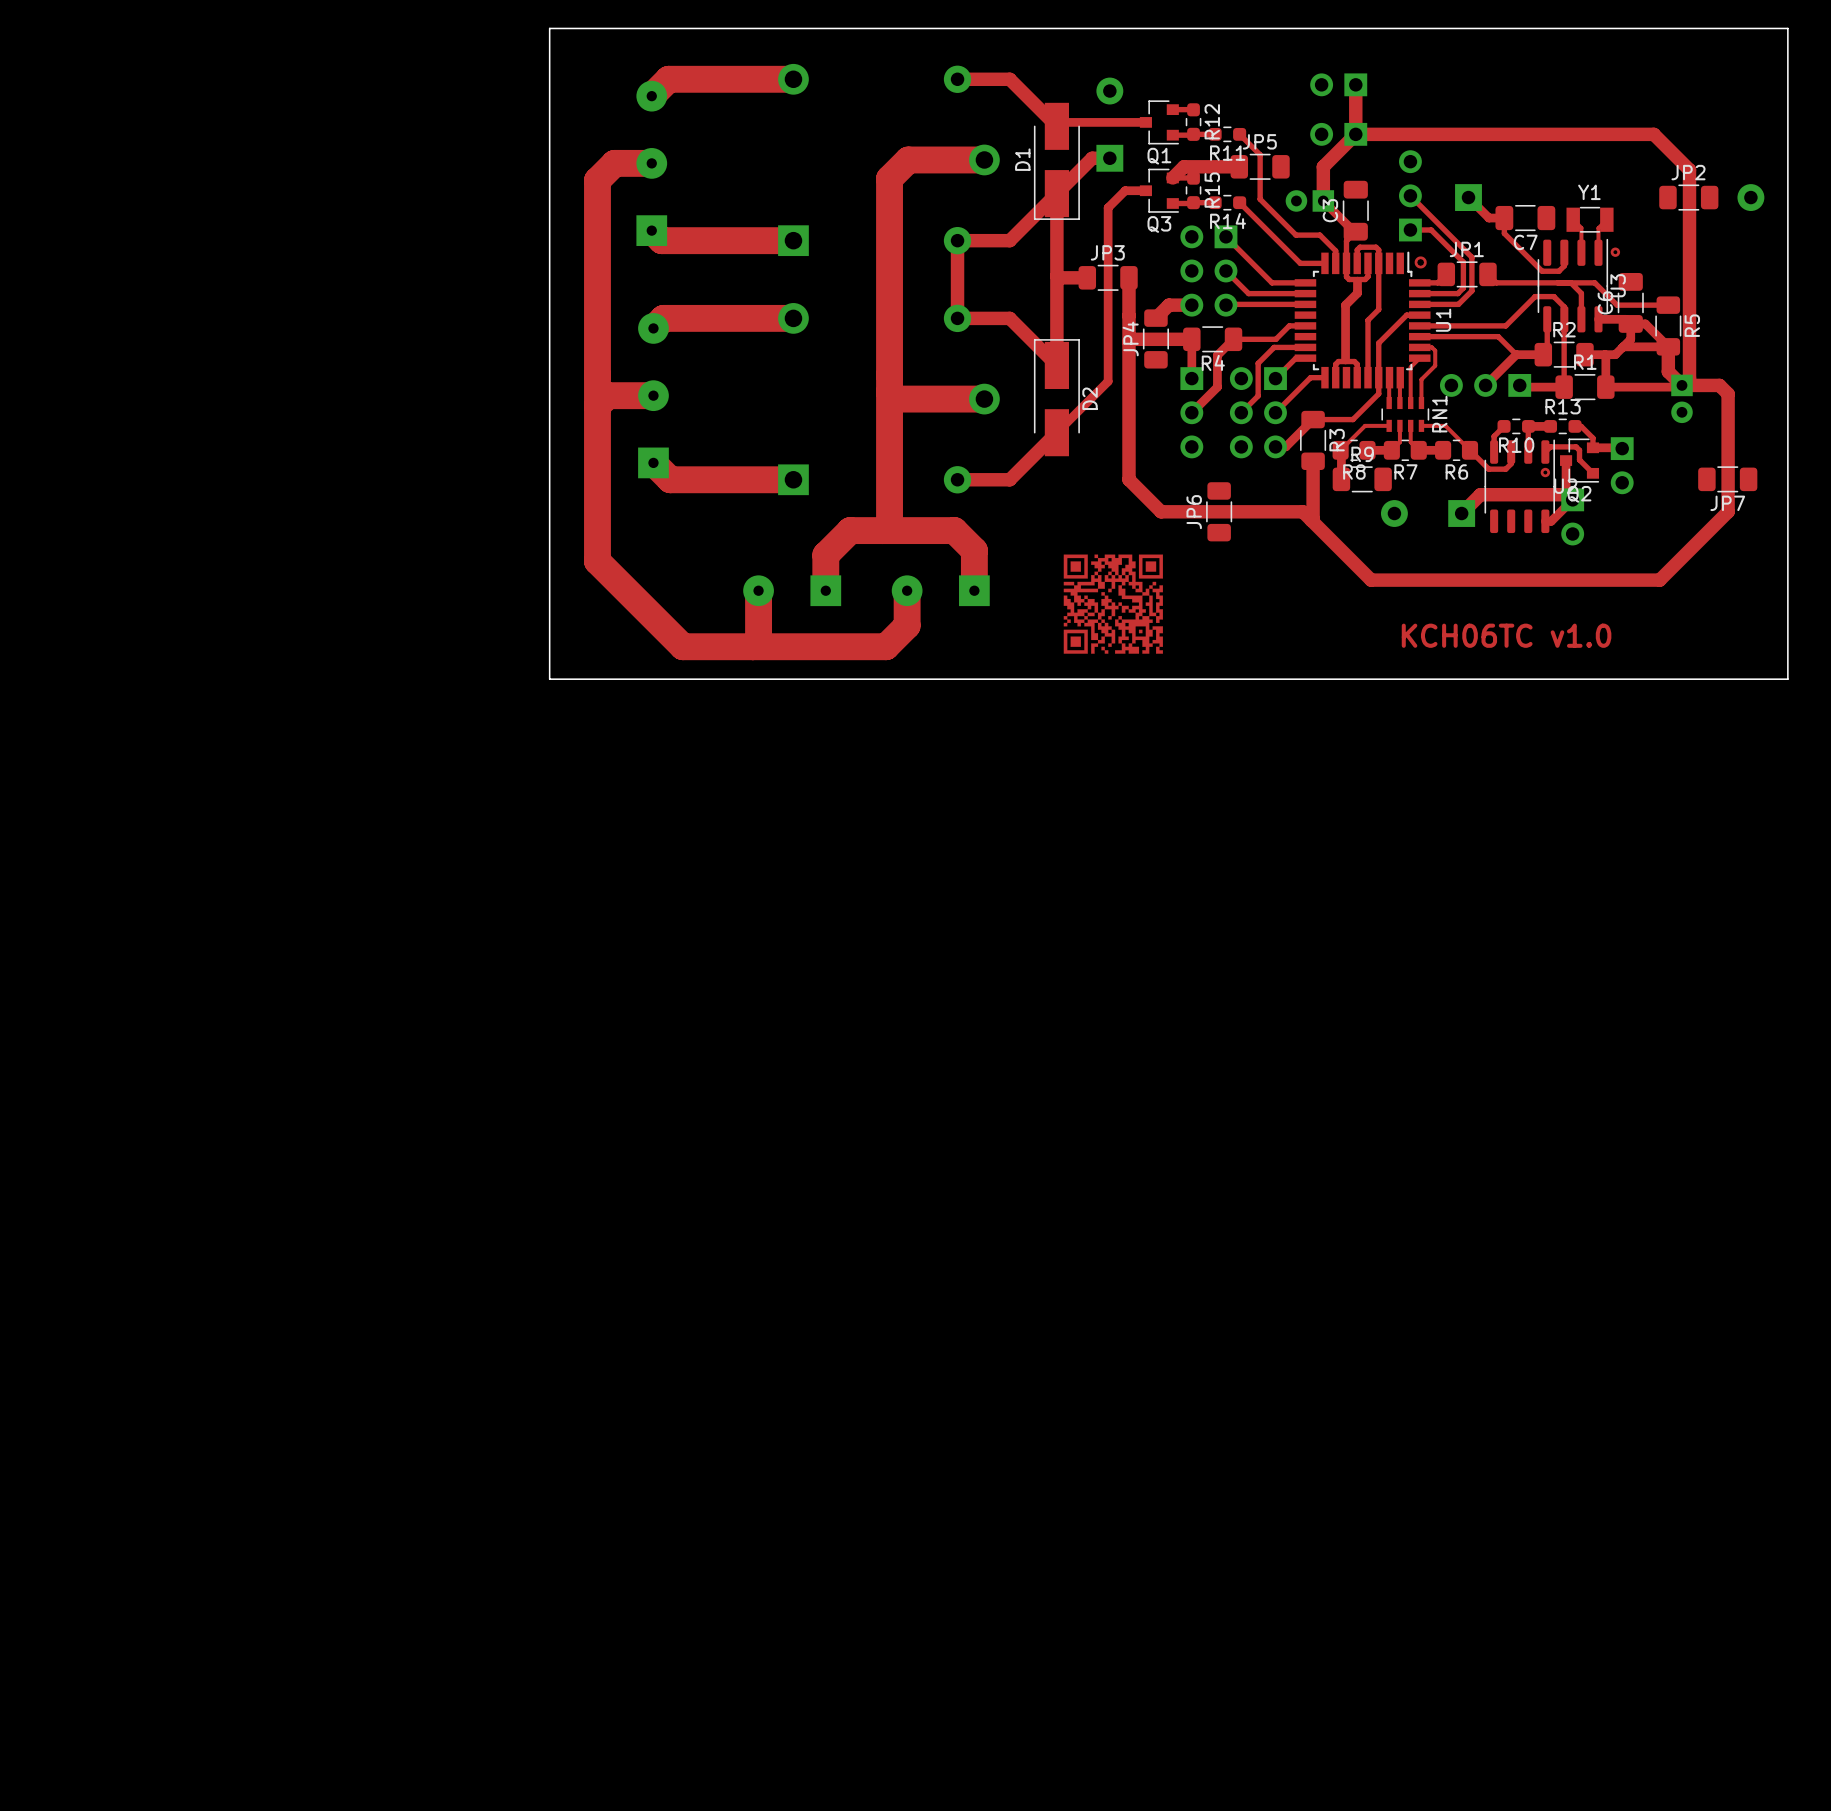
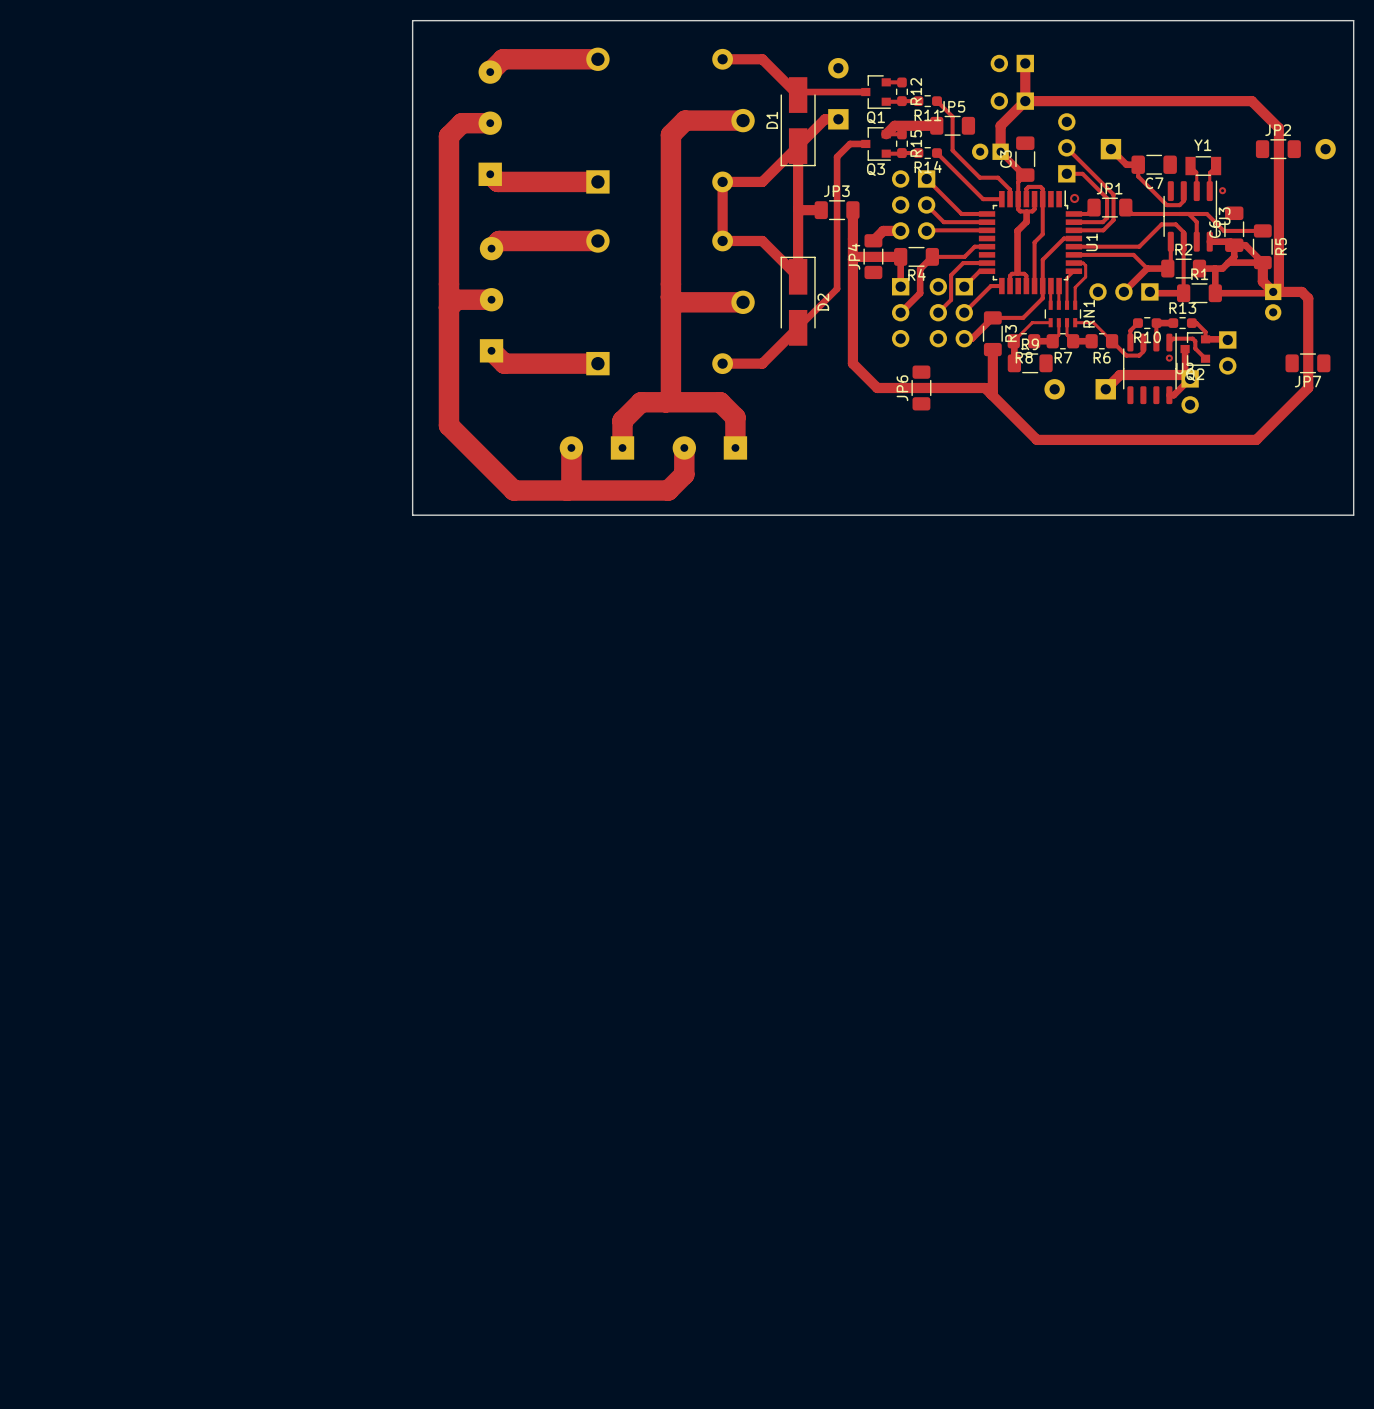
drawing: [1063, 554, 1163, 654] -> none
text: KCH06TC v1.0 (1506, 635) -> none

